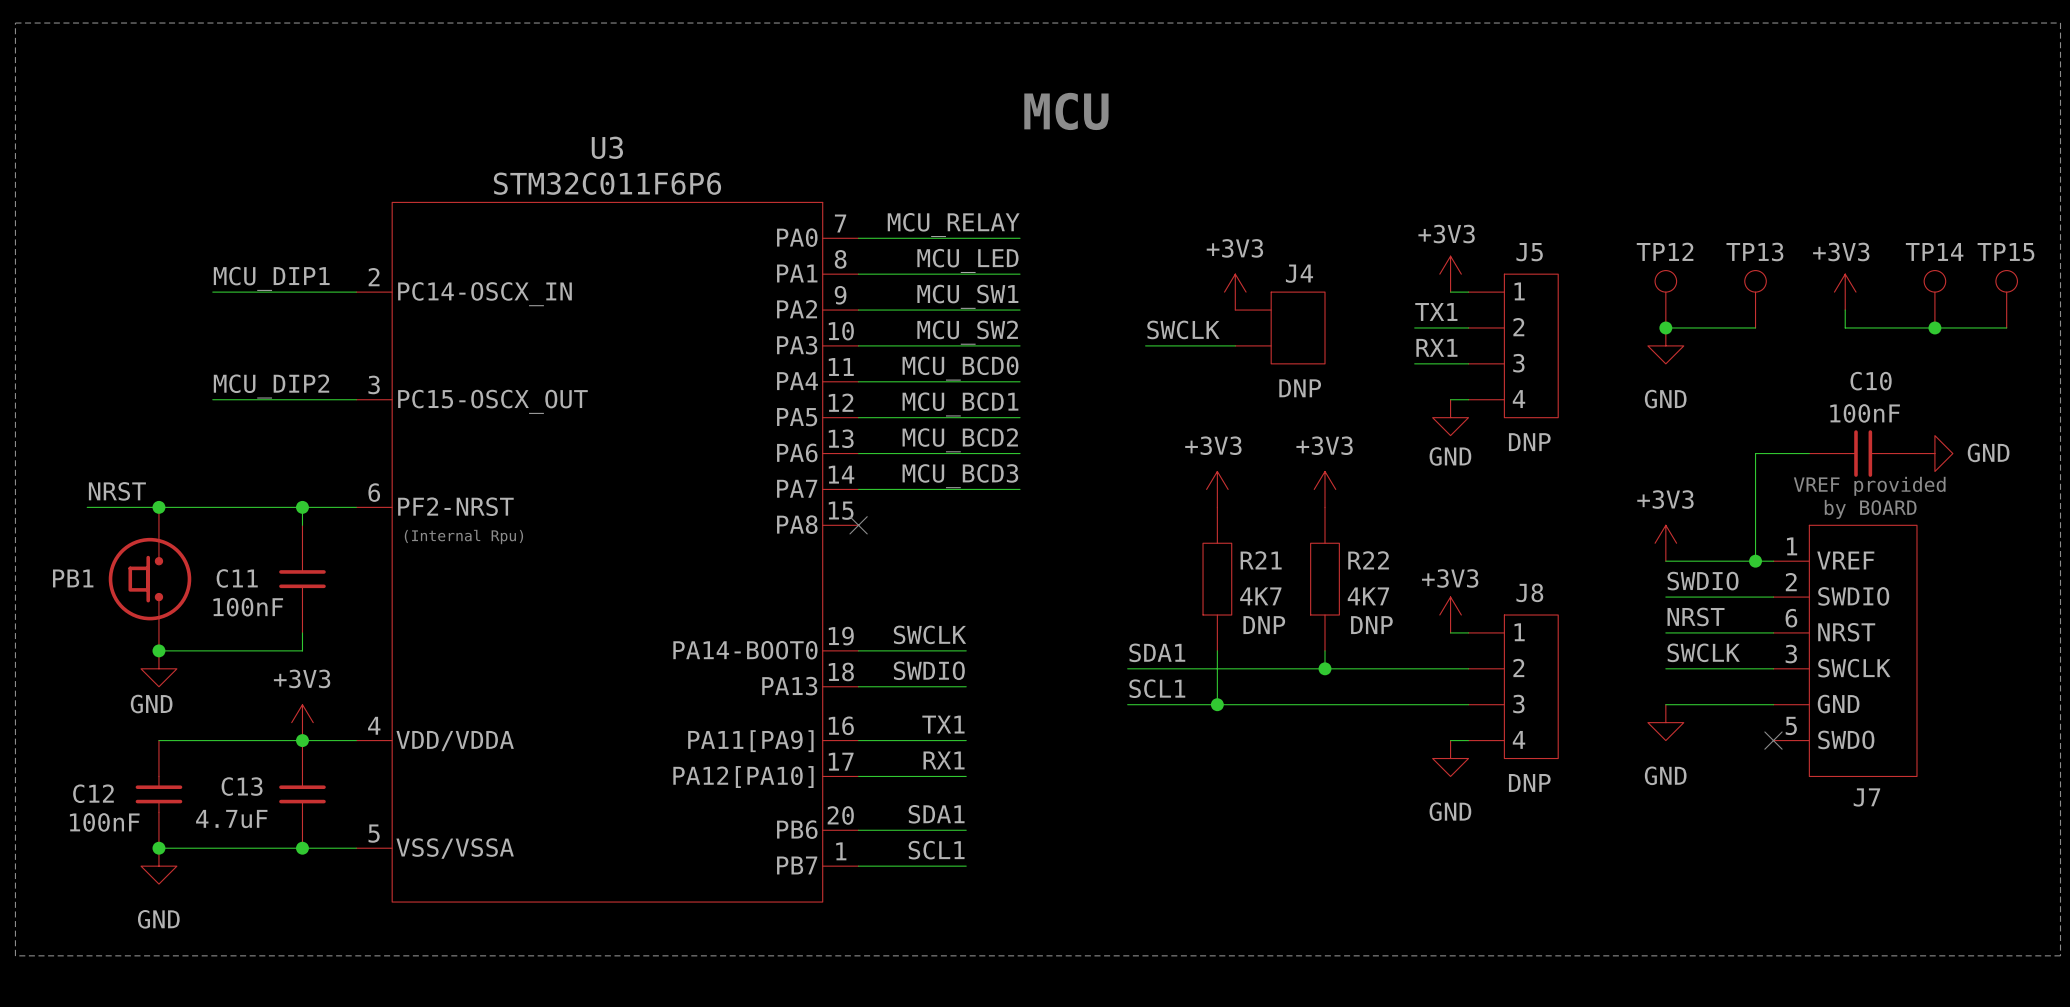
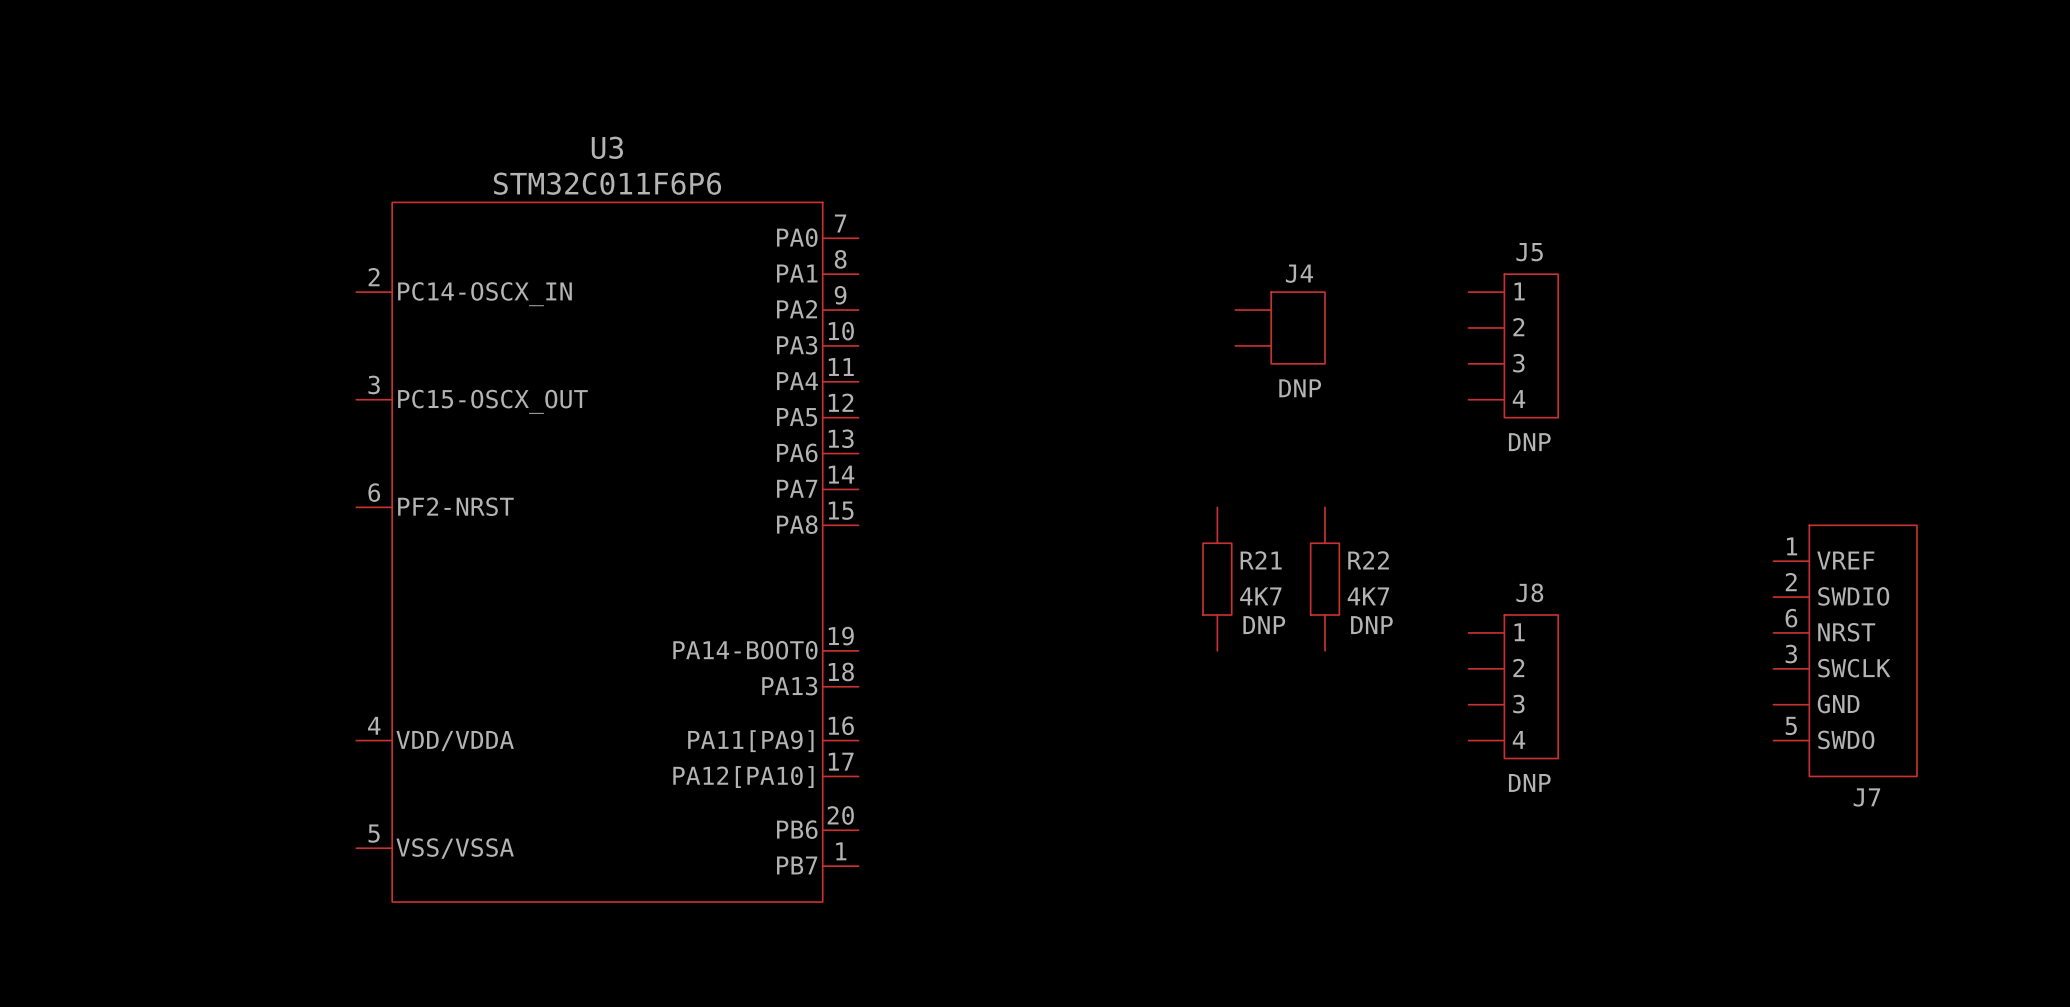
line: (15, 23) (2060, 23) (2060, 955) (15, 955) (15, 23) -> none
text: MCU (1066, 111) -> none
label: MCU_RELAY (953, 225) -> none
wire: (858, 238) (1020, 238) -> none
label: MCU_LED (967, 260) -> none
wire: (858, 274) (1020, 274) -> none
power symbol: +3V3 (1450, 274) -> none
label: MCU_DIP1 (271, 278) -> none
wire: (212, 292) (356, 292) -> none
power symbol: +3V3 (1235, 292) -> none
wire: (1450, 292) (1468, 292) -> none
power symbol: +3V3 (1845, 292) -> none
label: MCU_SW1 (967, 296) -> none
TP12: (1665, 299) -> none
TP13: (1755, 299) -> none
TP14: (1934, 299) -> none
TP15: (2006, 299) -> none
wire: (858, 310) (1020, 310) -> none
wire: (1845, 310) (1845, 327) (2006, 327) -> none
label: TX1 (1436, 311) -> none
wire: (1414, 327) (1468, 327) -> none
wire: (1665, 327) (1755, 327) -> none
junction: (1665, 327) -> none
junction: (1934, 327) -> none
label: SWCLK (1183, 329) -> none
label: MCU_SW2 (967, 332) -> none
wire: (858, 345) (1020, 345) -> none
wire: (1145, 345) (1235, 345) -> none
power symbol: GND (1665, 345) -> none
label: RX1 (1436, 347) -> none
wire: (1414, 363) (1468, 363) -> none
label: MCU_BCD0 (960, 368) -> none
wire: (858, 381) (1020, 381) -> none
label: MCU_DIP2 (271, 386) -> none
wire: (212, 399) (356, 399) -> none
wire: (1450, 399) (1468, 399) -> none
label: MCU_BCD1 (960, 404) -> none
wire: (858, 417) (1020, 417) -> none
power symbol: GND (1450, 417) -> none
label: MCU_BCD2 (960, 440) -> none
wire: (858, 453) (1020, 453) -> none
wire: (1809, 453) (1755, 453) (1755, 561) -> none
C10: 100nF (1863, 453) -> none
power symbol: GND (1934, 453) -> none
label: MCU_BCD3 (960, 476) -> none
text: VREF provided (1869, 486) -> none
wire: (858, 489) (1020, 489) -> none
power symbol: +3V3 (1217, 489) -> none
power symbol: +3V3 (1325, 489) -> none
label: NRST (117, 491) -> none
wire: (87, 507) (356, 507) -> none
junction: (158, 507) -> none
wire: (302, 507) (302, 525) -> none
junction: (302, 507) -> none
text: by BOARD (1870, 509) -> none
no-connect mark: (858, 525) -> none
text: (Internal Rpu) (463, 537) -> none
power symbol: +3V3 (1665, 543) -> none
wire: (1665, 561) (1773, 561) -> none
junction: (1755, 561) -> none
PB1: (149, 579) -> none
C11: 100nF (302, 579) -> none
label: SWDIO (1703, 581) -> none
wire: (1665, 597) (1773, 597) -> none
power symbol: +3V3 (1450, 615) -> none
label: NRST (1696, 616) -> none
wire: (302, 632) (302, 650) (158, 650) -> none
wire: (1450, 632) (1468, 632) -> none
wire: (1665, 632) (1773, 632) -> none
label: SWCLK (929, 634) -> none
junction: (158, 650) -> none
wire: (858, 650) (966, 650) -> none
wire: (1217, 650) (1217, 704) -> none
wire: (1325, 650) (1325, 668) -> none
label: SDA1 (1157, 652) -> none
label: SWCLK (1703, 652) -> none
power symbol: GND (158, 668) -> none
wire: (1127, 668) (1468, 668) -> none
junction: (1325, 668) -> none
wire: (1665, 668) (1773, 668) -> none
label: SWDIO (929, 670) -> none
wire: (858, 686) (966, 686) -> none
label: SCL1 (1157, 688) -> none
wire: (1127, 704) (1468, 704) -> none
junction: (1217, 704) -> none
wire: (1665, 704) (1773, 704) -> none
power symbol: +3V3 (302, 722) -> none
power symbol: GND (1665, 722) -> none
label: TX1 (943, 724) -> none
wire: (158, 740) (356, 740) -> none
junction: (302, 740) -> none
wire: (858, 740) (966, 740) -> none
wire: (1450, 740) (1468, 740) -> none
no-connect mark: (1773, 740) -> none
power symbol: GND (1450, 758) -> none
label: RX1 (944, 760) -> none
wire: (858, 776) (966, 776) -> none
C12: 100nF (158, 794) -> none
C13: 4.7uF (302, 794) -> none
label: SDA1 (936, 814) -> none
wire: (858, 830) (966, 830) -> none
wire: (158, 848) (356, 848) -> none
junction: (158, 848) -> none
junction: (302, 848) -> none
label: SCL1 (936, 850) -> none
power symbol: GND (158, 866) -> none
wire: (858, 866) (966, 866) -> none

